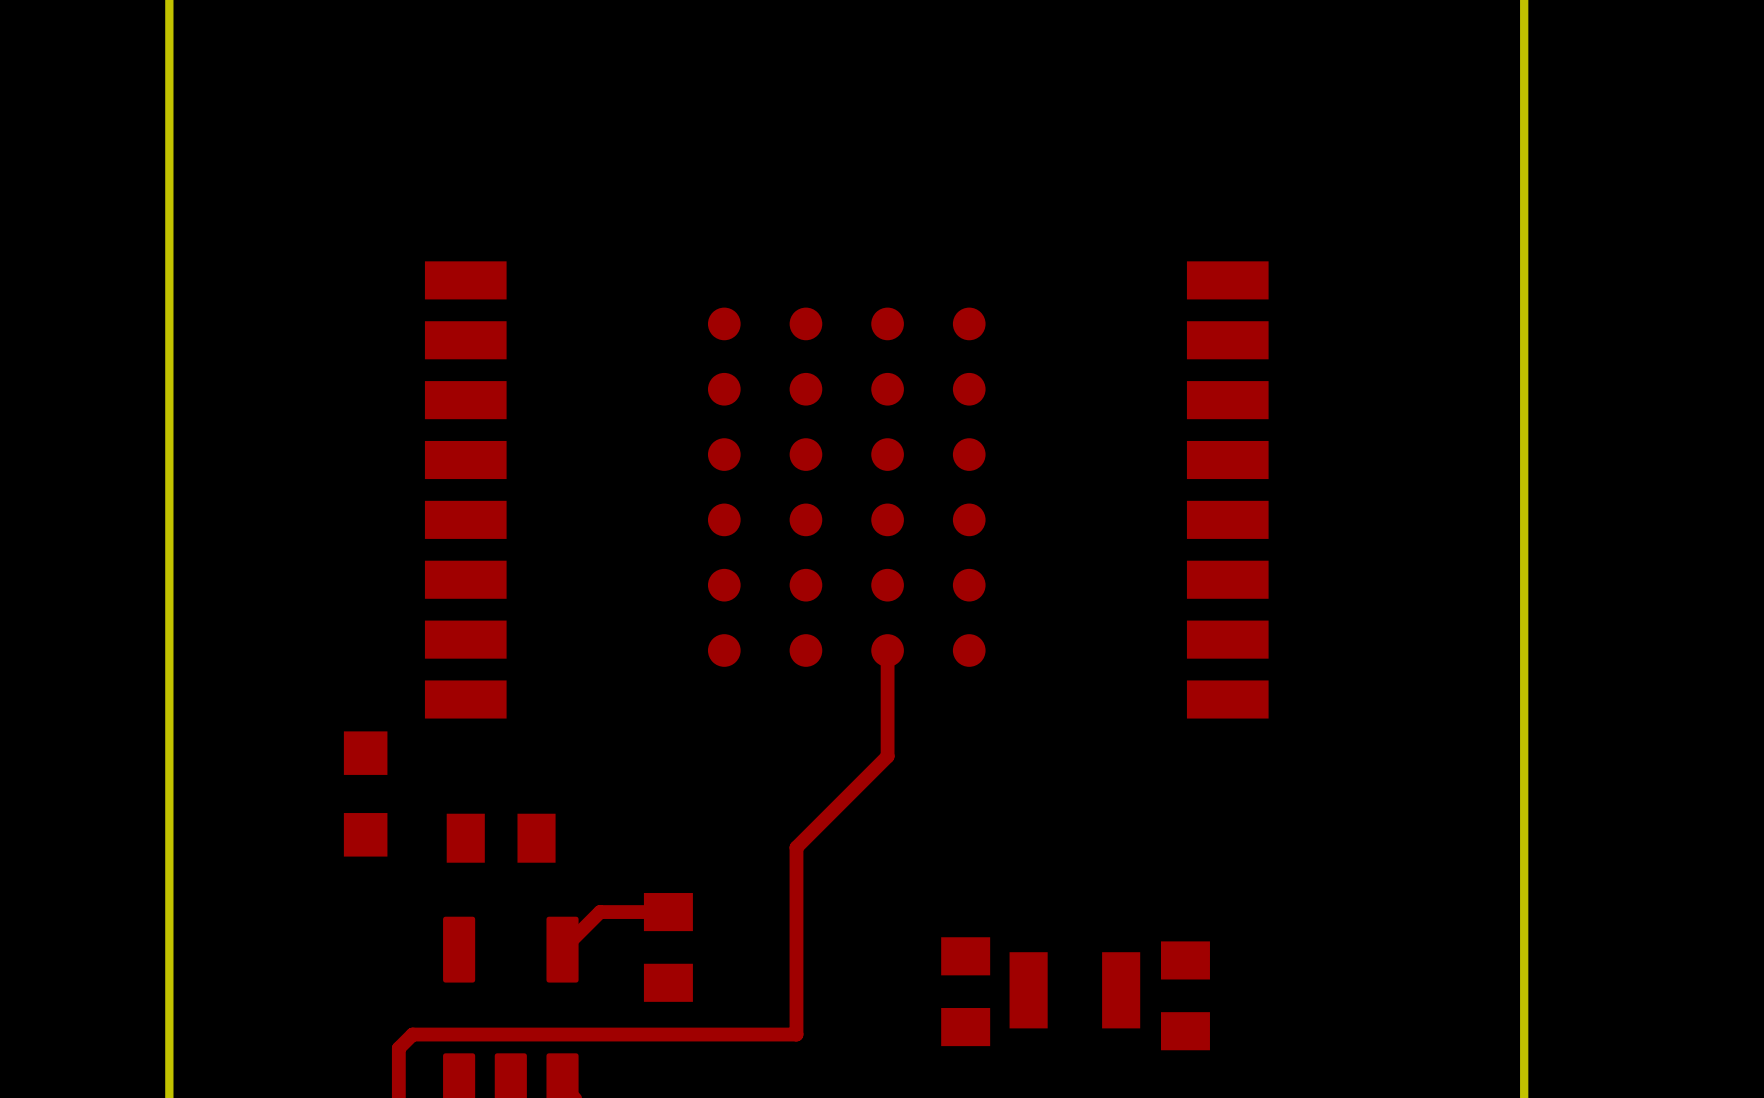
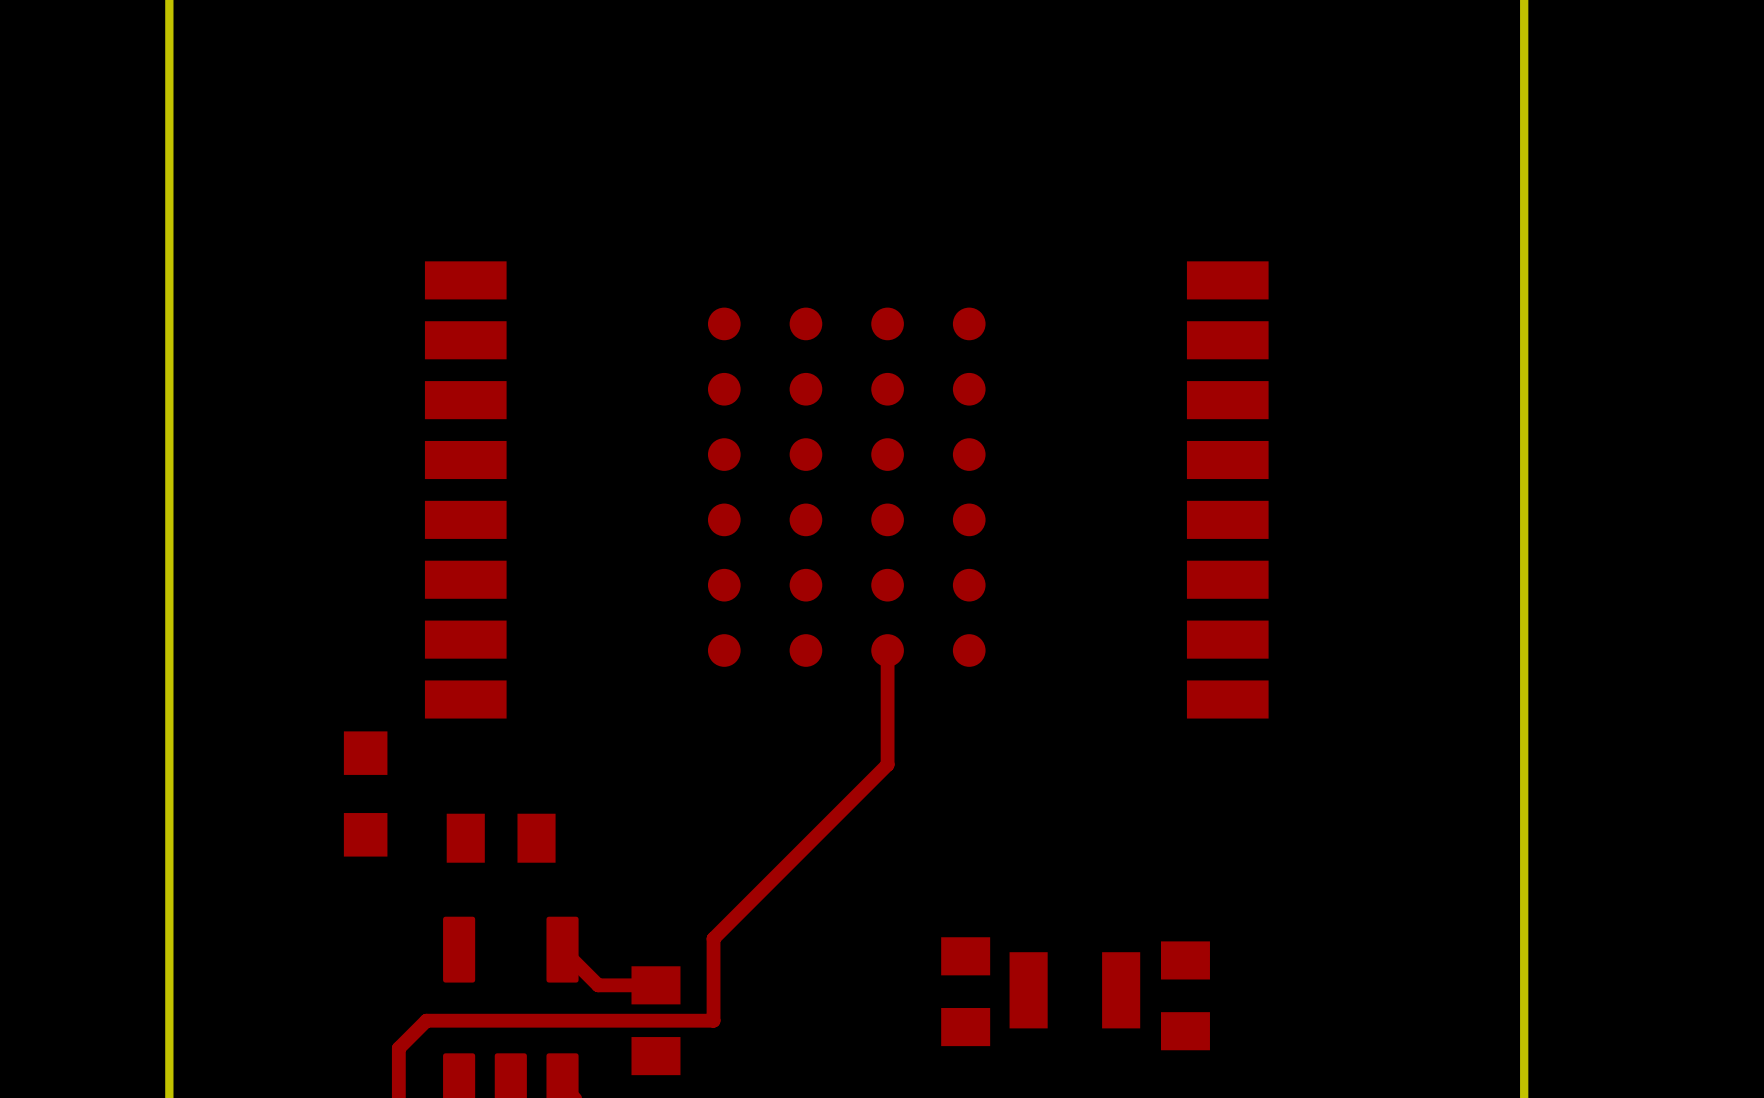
top track: (887, 756) (796, 847) (796, 1034) (412, 1034) -> (887, 756) (887, 764) (713, 938) (713, 1020) (426, 1020) (412, 1034)
top track: (668, 912) (600, 912) (562, 949) -> (655, 985) (598, 985) (562, 949)
part position: (668, 947) -> (655, 1020)

